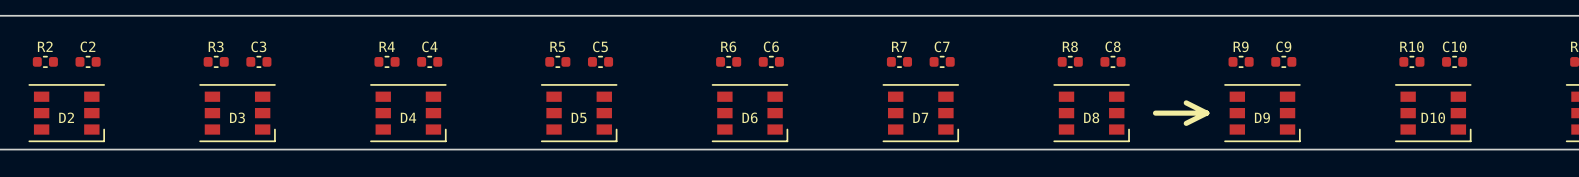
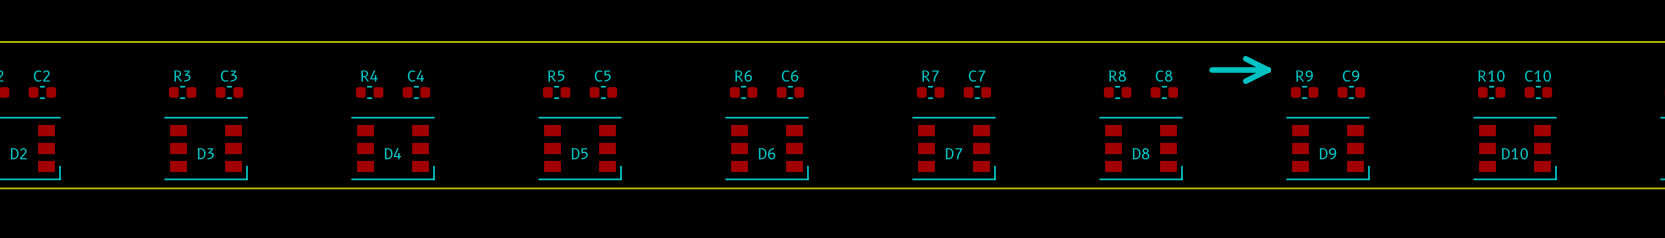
line: (1186, 102) (1206, 113) -> (1245, 58) (1268, 70)
line: (1155, 113) (1206, 113) -> (1212, 70) (1268, 70)
line: (1206, 113) (1186, 123) -> (1268, 70) (1245, 81)

